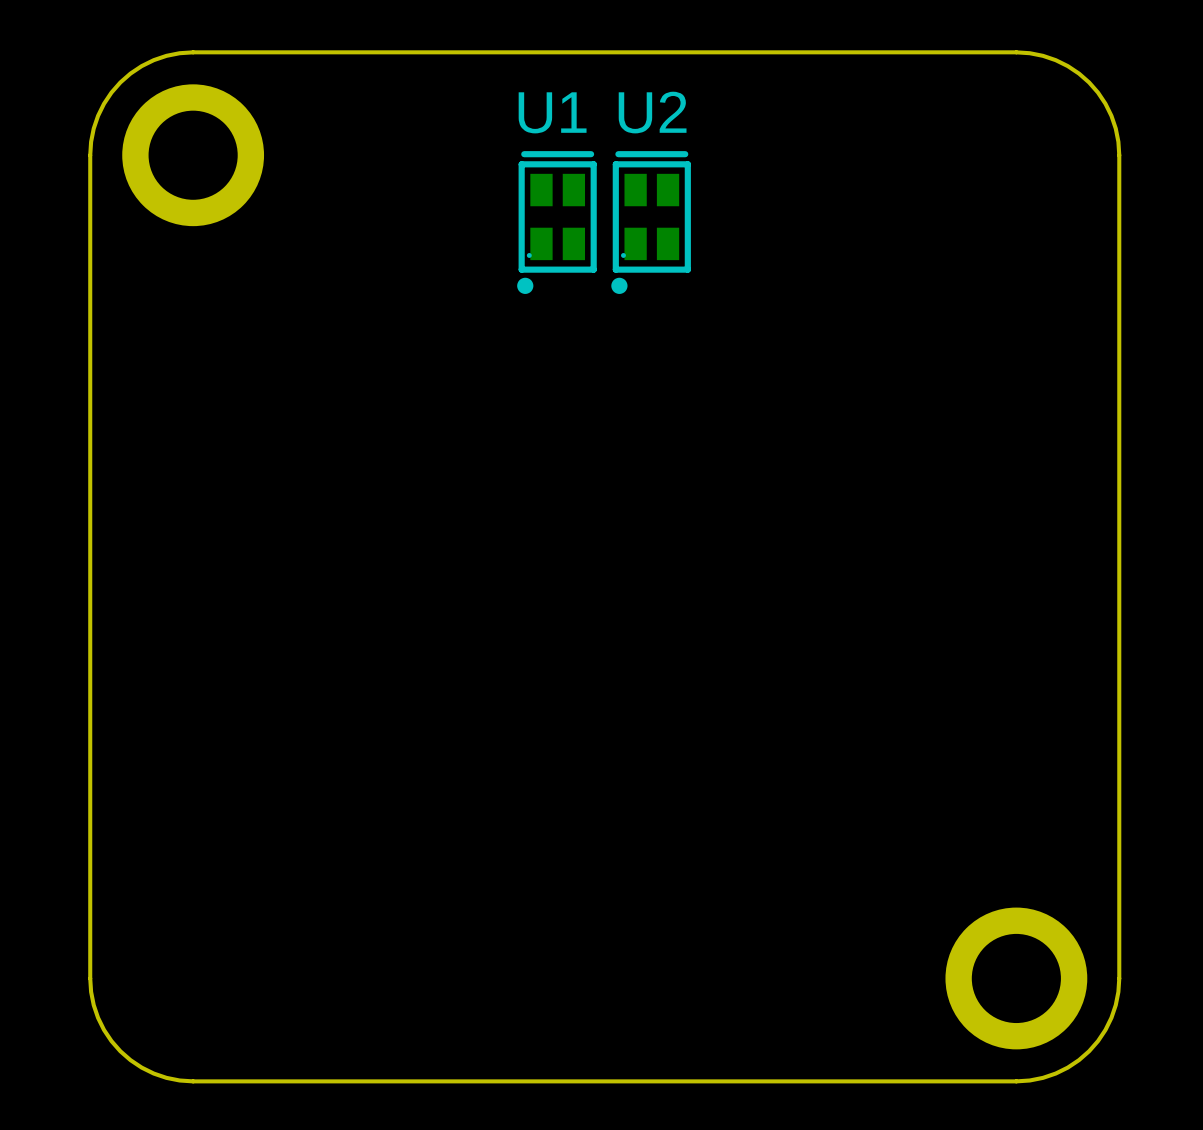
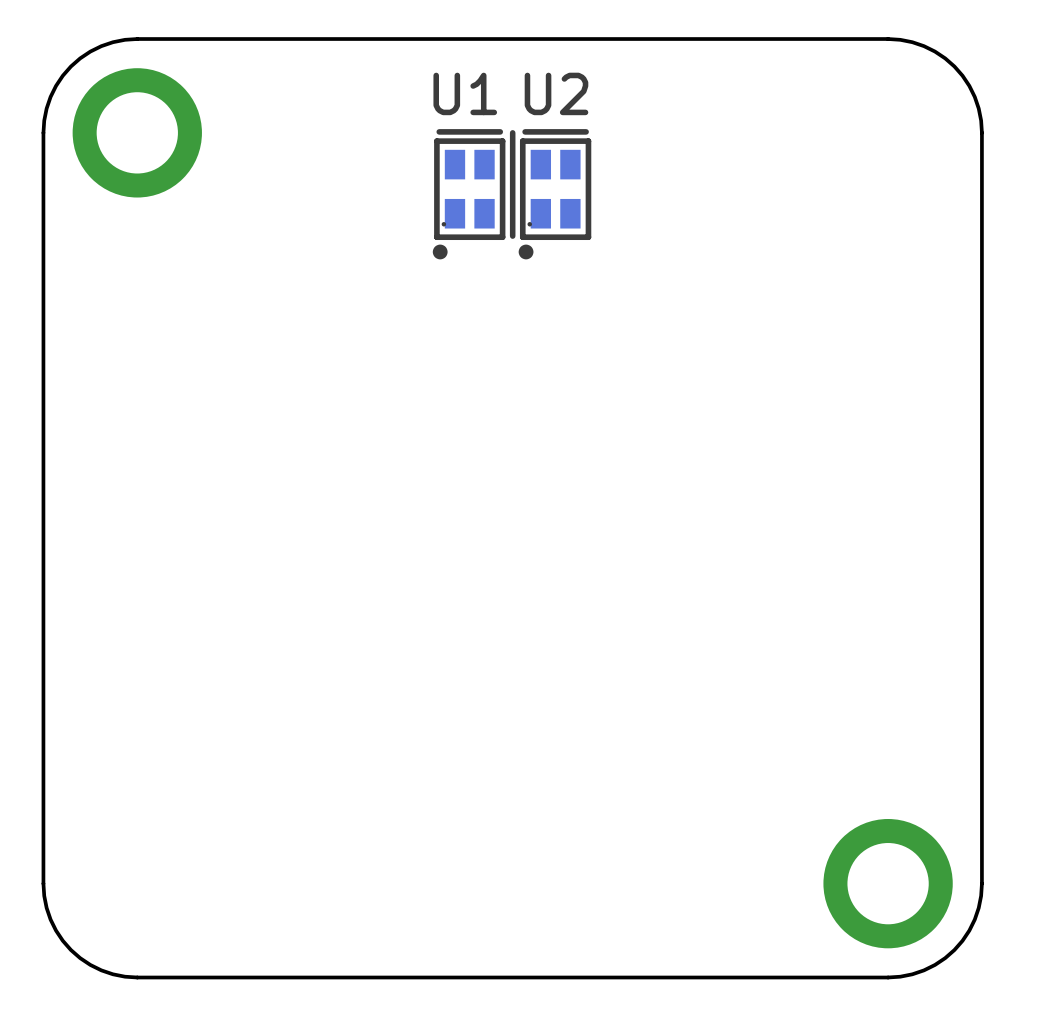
line: none -> (512, 132) (512, 236)

